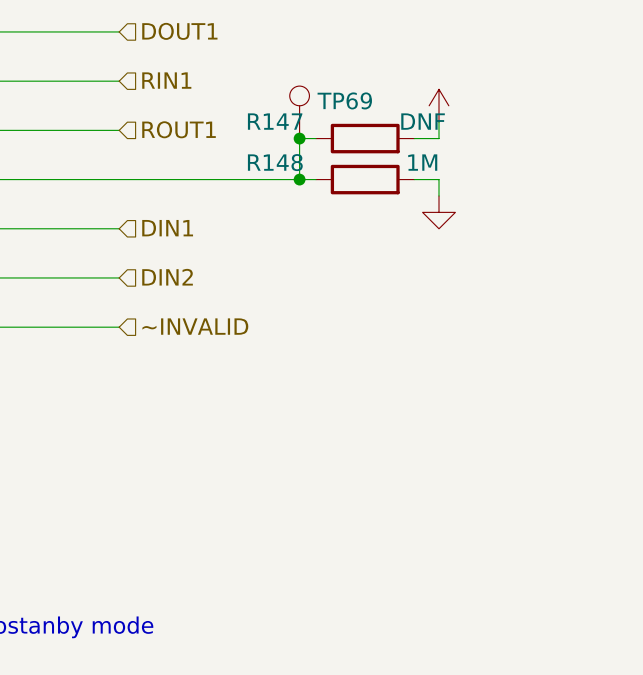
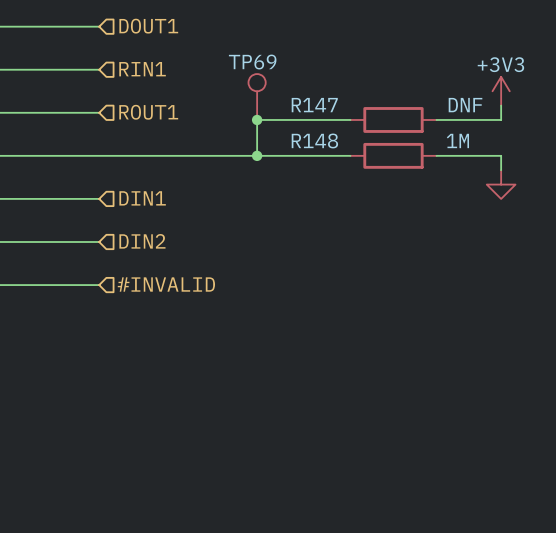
TP69 name position: TP69 (344, 100) -> TP69 (252, 62)
power symbol: (439, 105) -> none
power symbol: none -> +3V3 (501, 91)
R147 value position: DNF (423, 121) -> DNF (465, 105)
wire: (439, 122) (439, 138) (414, 138) -> none
wire: none -> (501, 105) (501, 119) (436, 119)
wire: none -> (271, 119) (350, 119)
R147 position: (365, 138) -> (393, 119)
R148 value position: 1M (422, 162) -> 1M (457, 140)
wire: none -> (271, 155) (350, 155)
R148 position: (365, 179) -> (393, 155)
wire: (414, 179) (439, 179) (439, 195) -> none
wire: none -> (436, 155) (501, 155) (501, 170)
power symbol position: (439, 212) -> (501, 184)
hierarchical label: ~INVALID (195, 326) -> #INVALID (166, 284)

